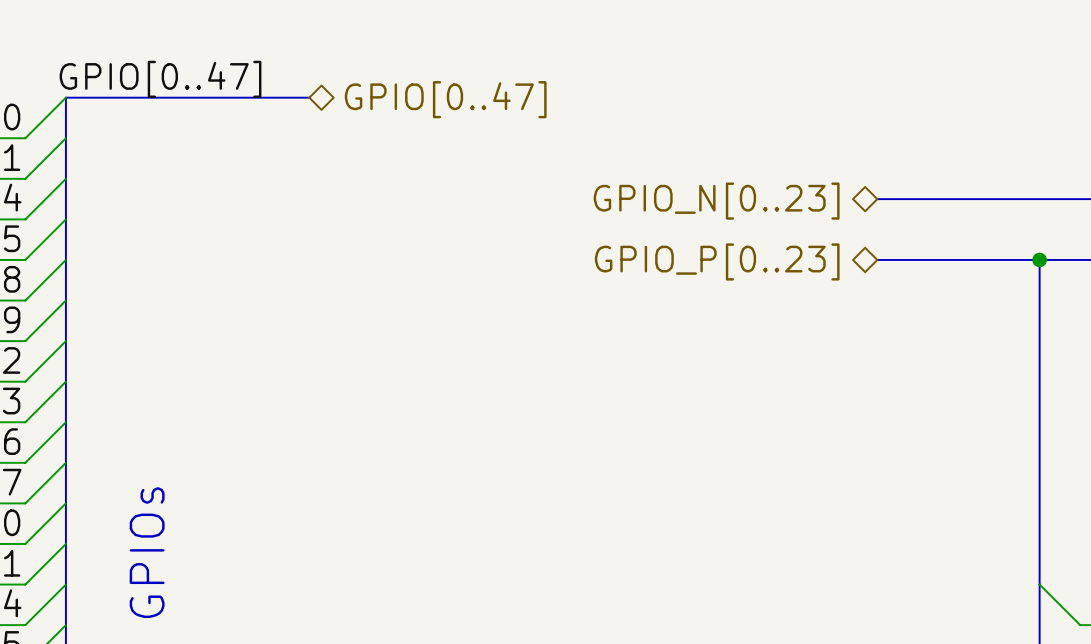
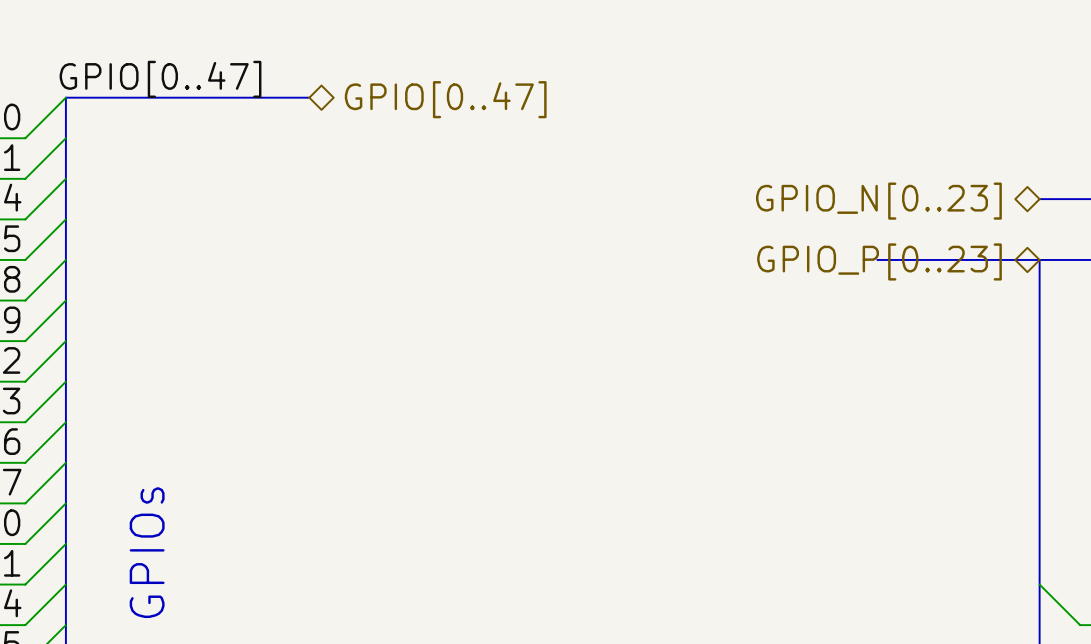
bus: (877, 199) (1039, 199) -> none
hierarchical label position: GPIO_N[0..23] (716, 201) -> GPIO_N[0..23] (878, 201)
junction: (1039, 259) -> none
hierarchical label position: GPIO_P[0..23] (717, 261) -> GPIO_P[0..23] (879, 261)

